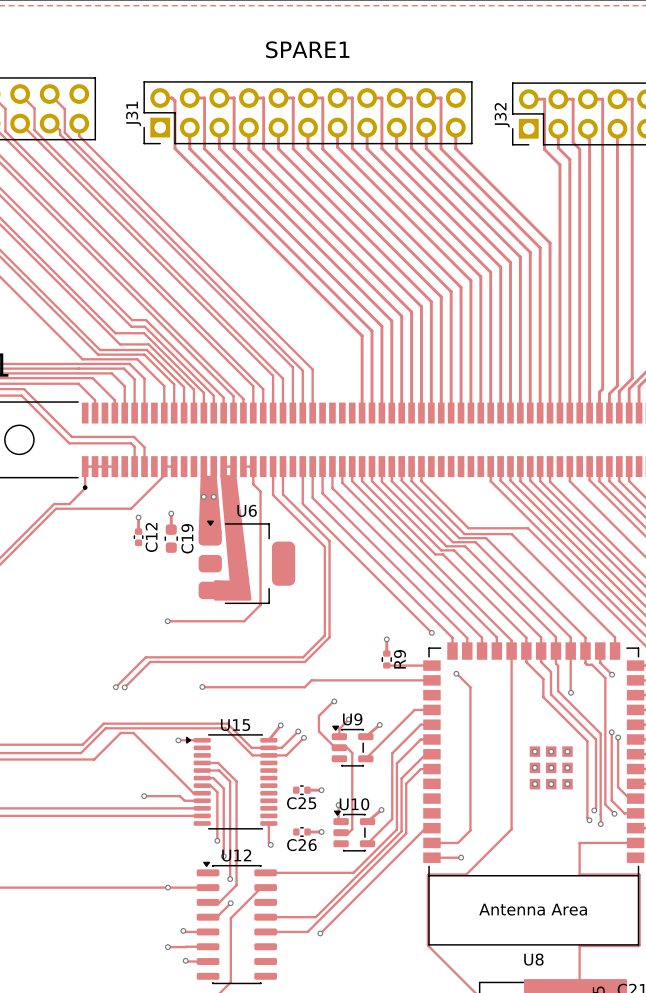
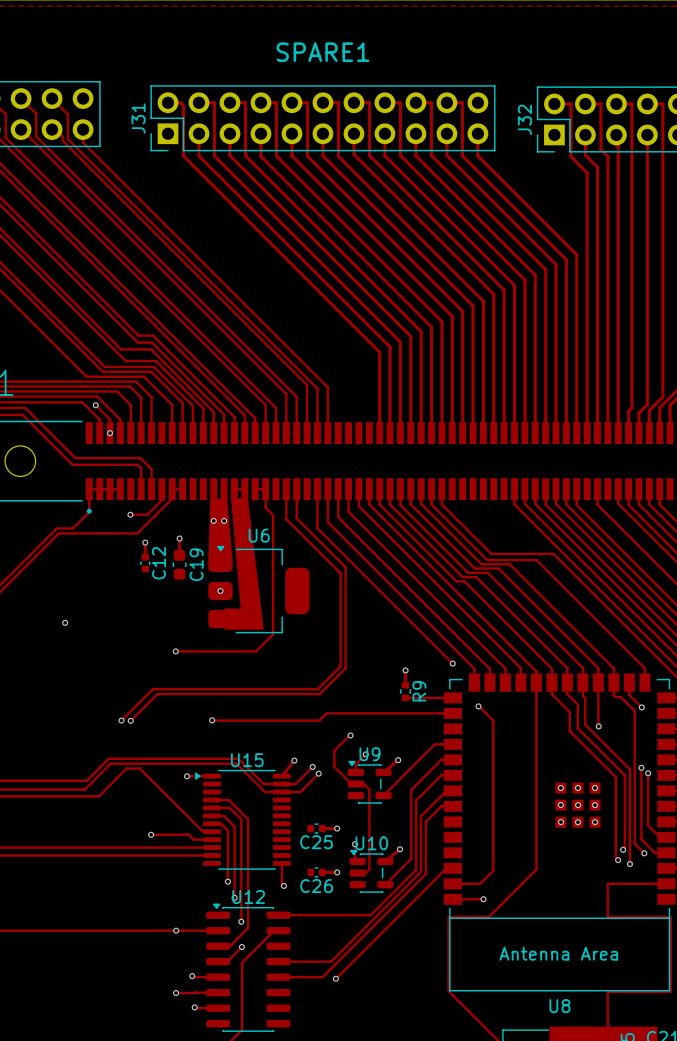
track: none -> (95, 405) (110, 419) (110, 433)
via: none -> (95, 405)
via: none -> (110, 433)
track: none -> (161, 489) (161, 500) (147, 514) (130, 514)
via: none -> (130, 514)
via: none -> (220, 591)
via: none -> (65, 622)

